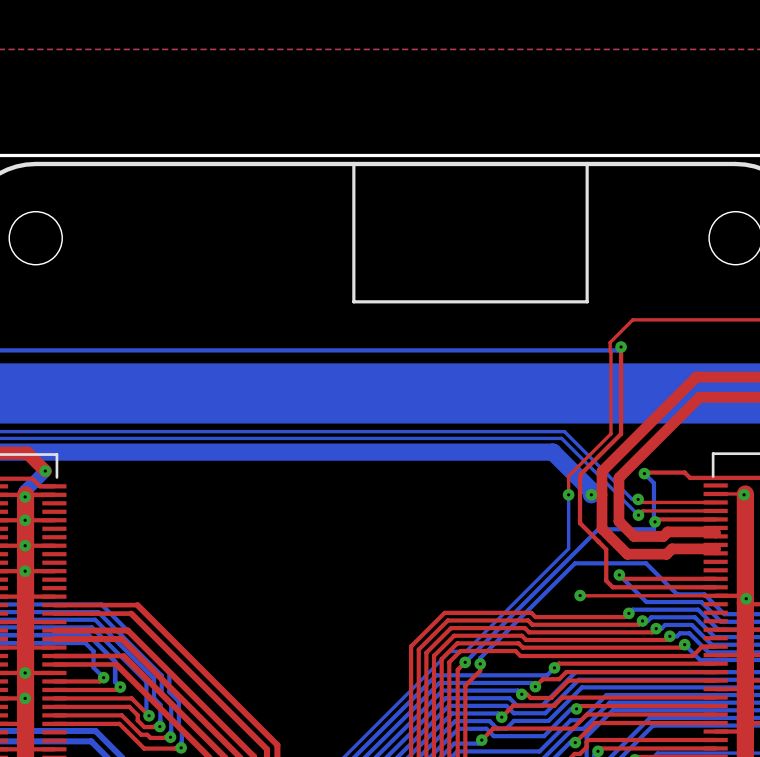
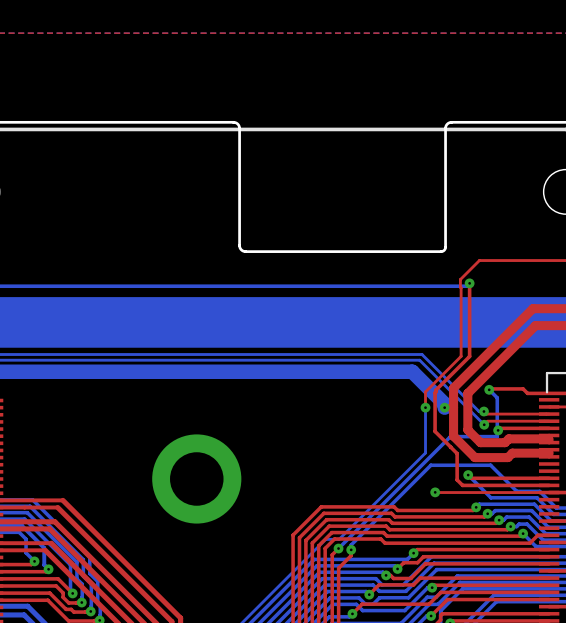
board edge: (340, 155) (599, 155) -> (233, 122) (239, 127) (239, 245) (241, 249) (245, 251) (443, 251) (445, 247) (445, 128) (447, 124) (451, 122)
line: (353, 163) (353, 301) (587, 301) (587, 163) -> none
via: none -> (196, 478)

